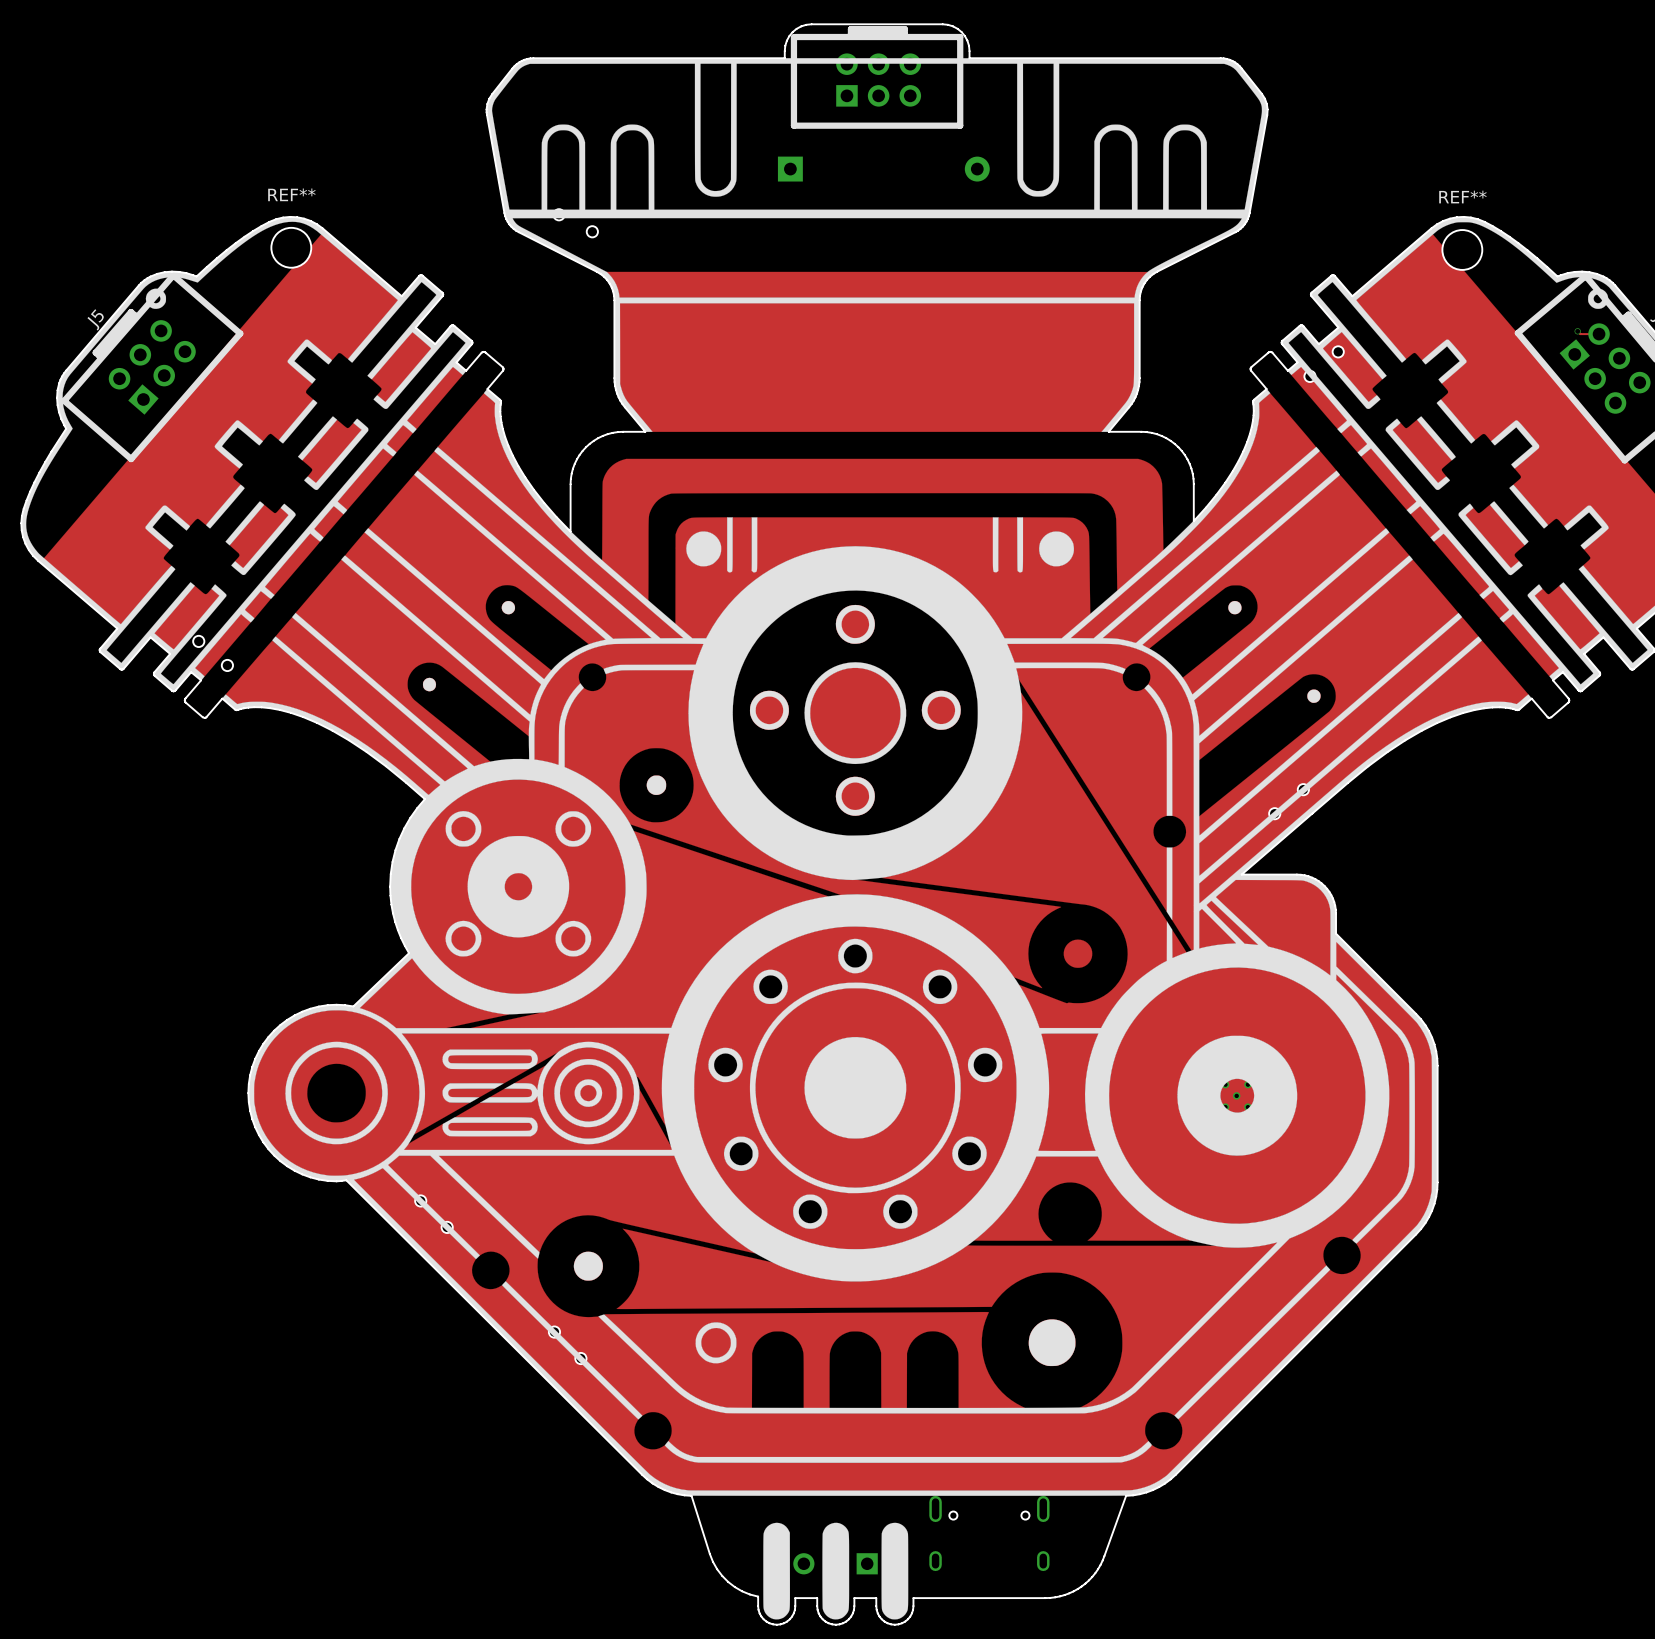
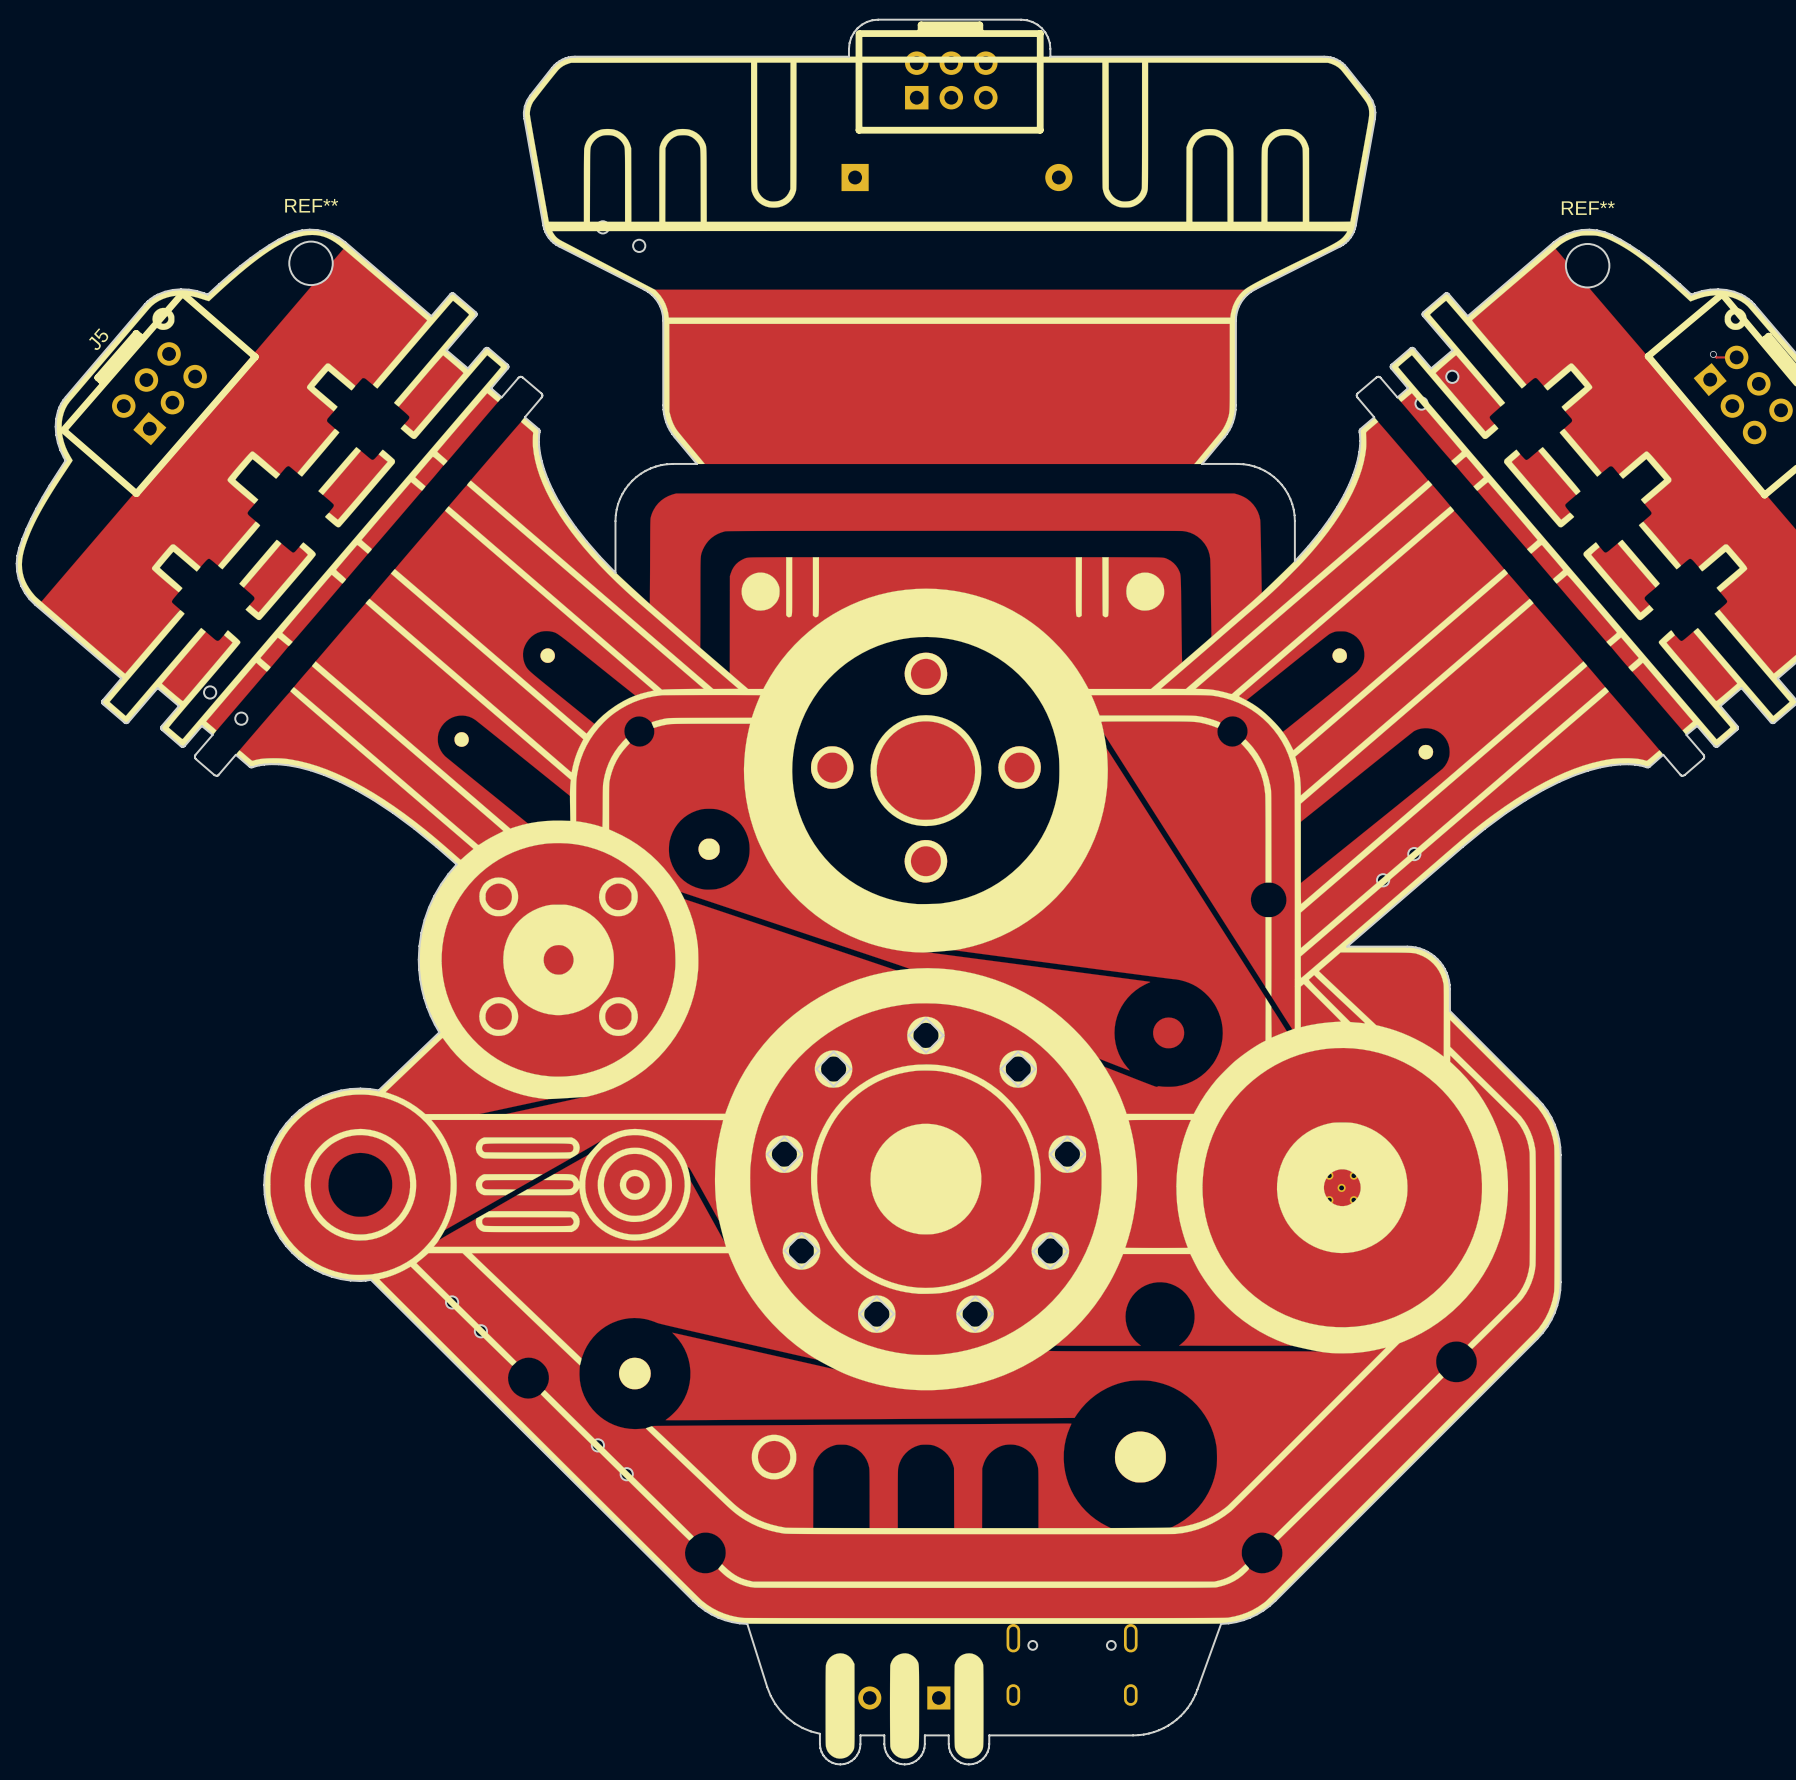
part: none -> (926, 1035)
part: none -> (833, 1069)
part: none -> (1018, 1069)
part: none -> (784, 1154)
part: none -> (1067, 1154)
part: none -> (801, 1250)
part: none -> (1050, 1251)
part: none -> (876, 1314)
part: none -> (975, 1314)

